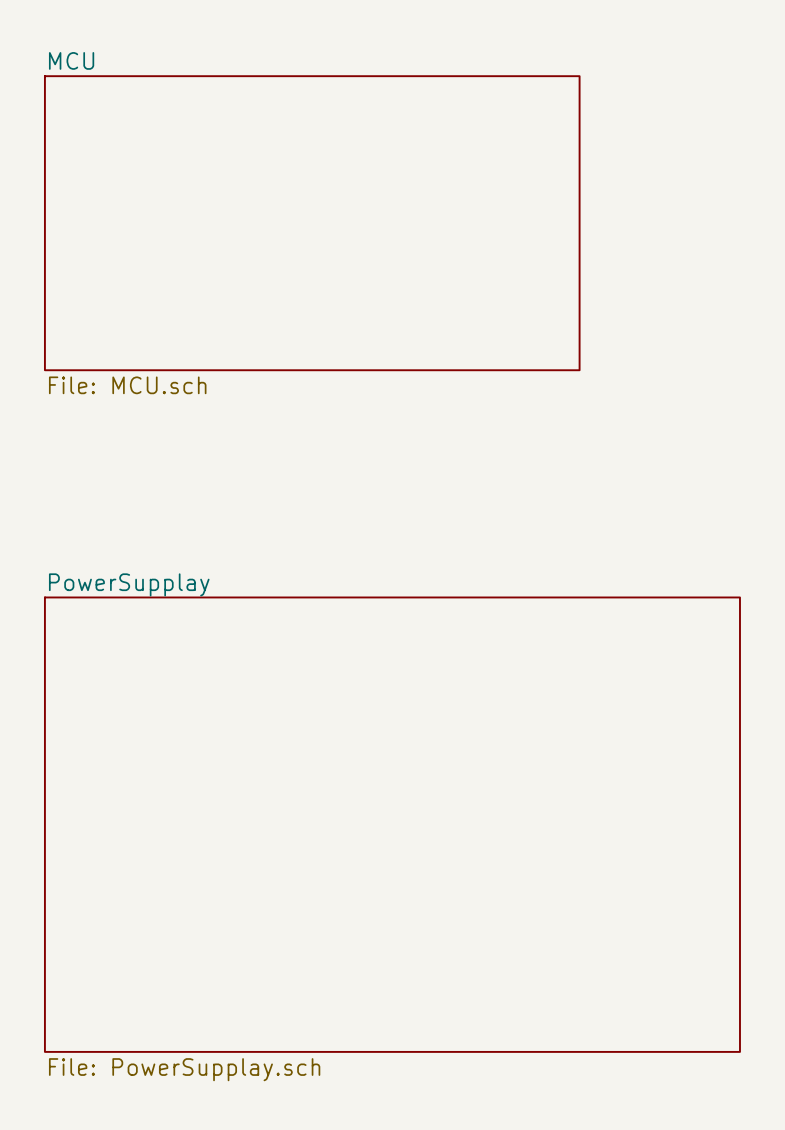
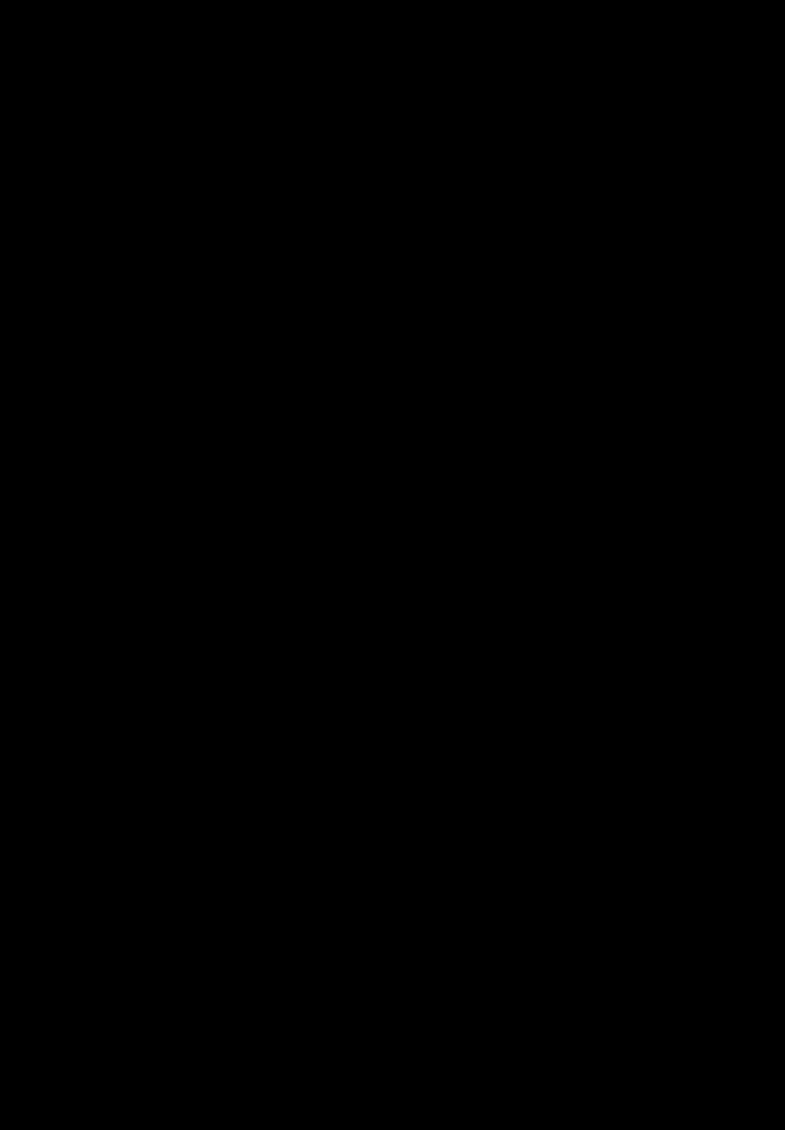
sheet MCU: File: MCU.sch (312, 223) -> none
sheet PowerSupplay: File: PowerSupplay.sch (392, 824) -> none

